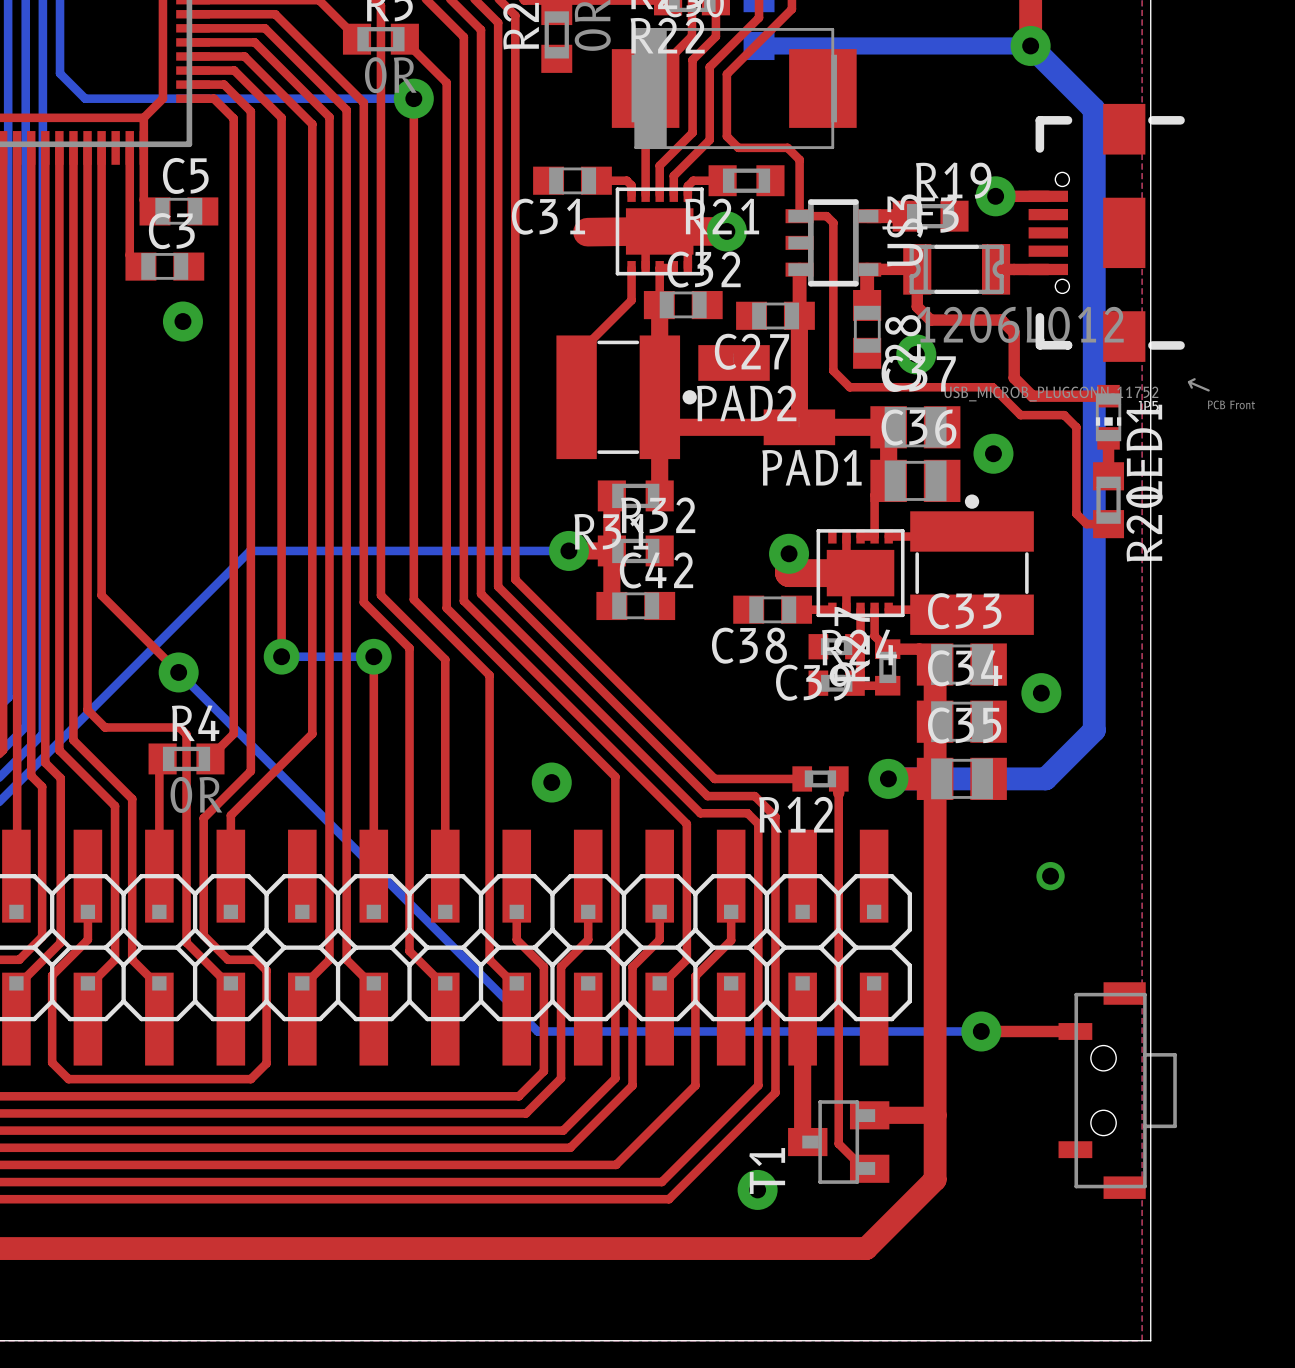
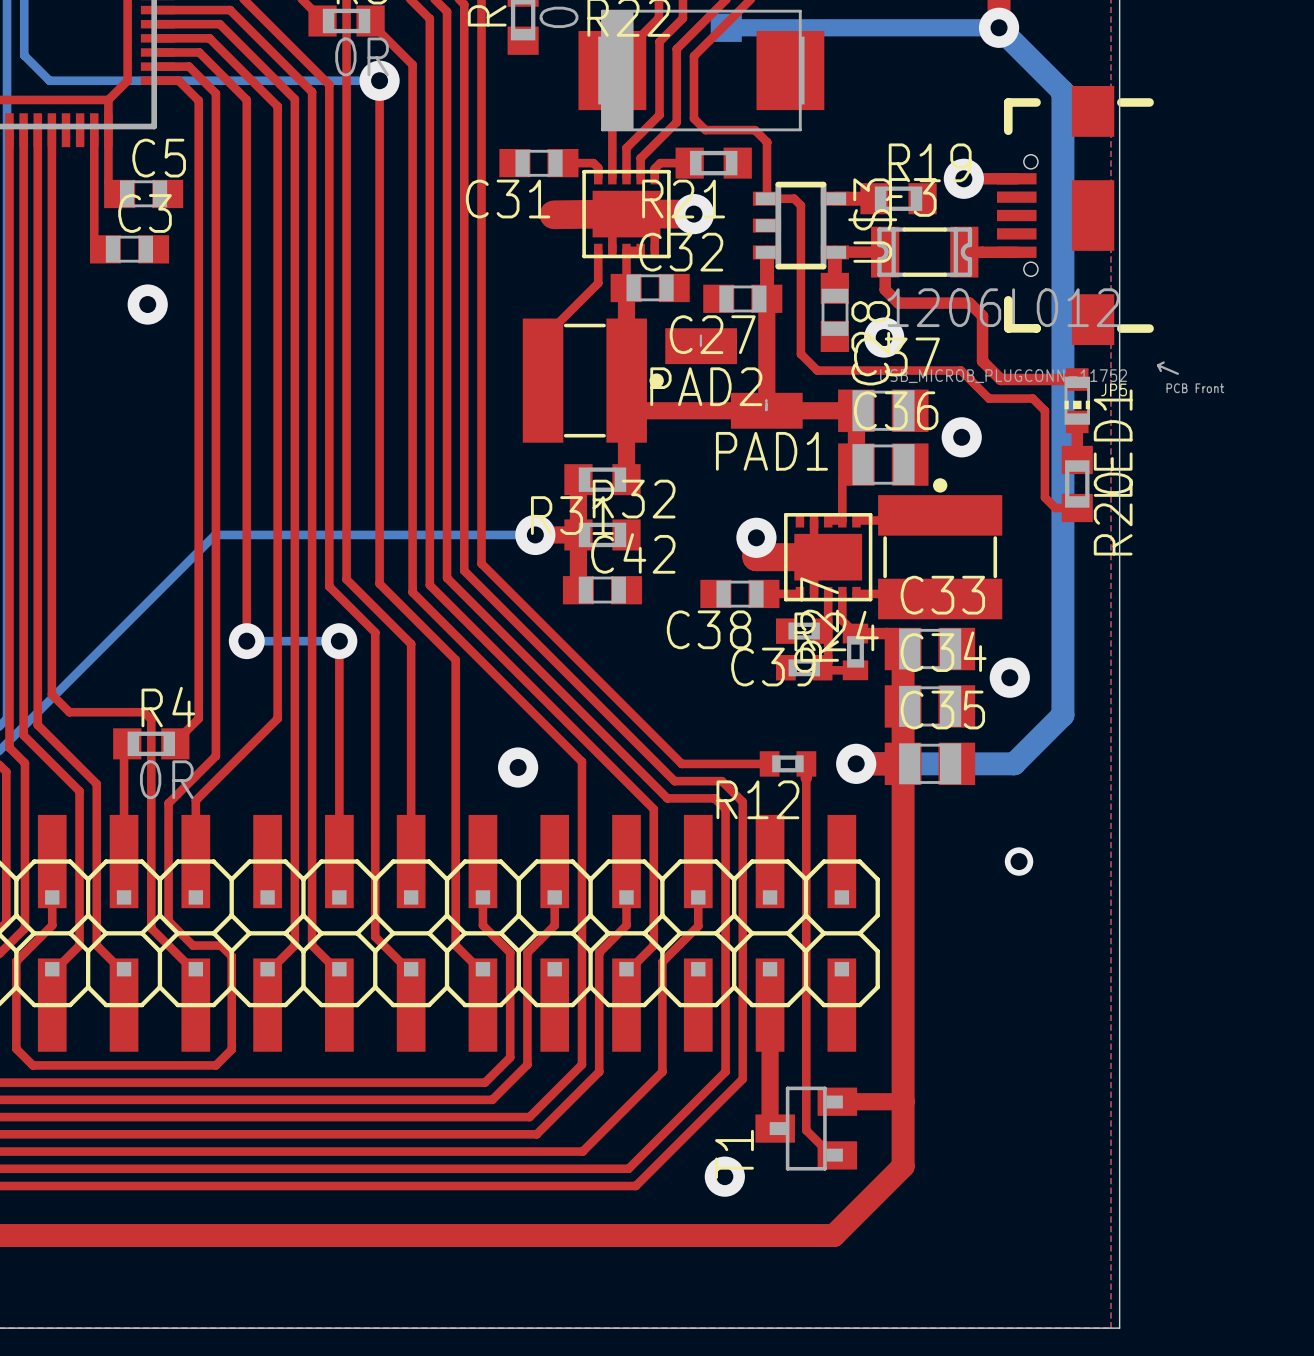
top track: (101, 147) (101, 595) (178, 672) -> none
bottom track: (178, 672) (537, 1031) (981, 1031) -> none
via: (178, 672) -> none
top track: (981, 1031) (1075, 1031) -> none
via: (981, 1031) -> none
part: (1117, 1090) -> none

